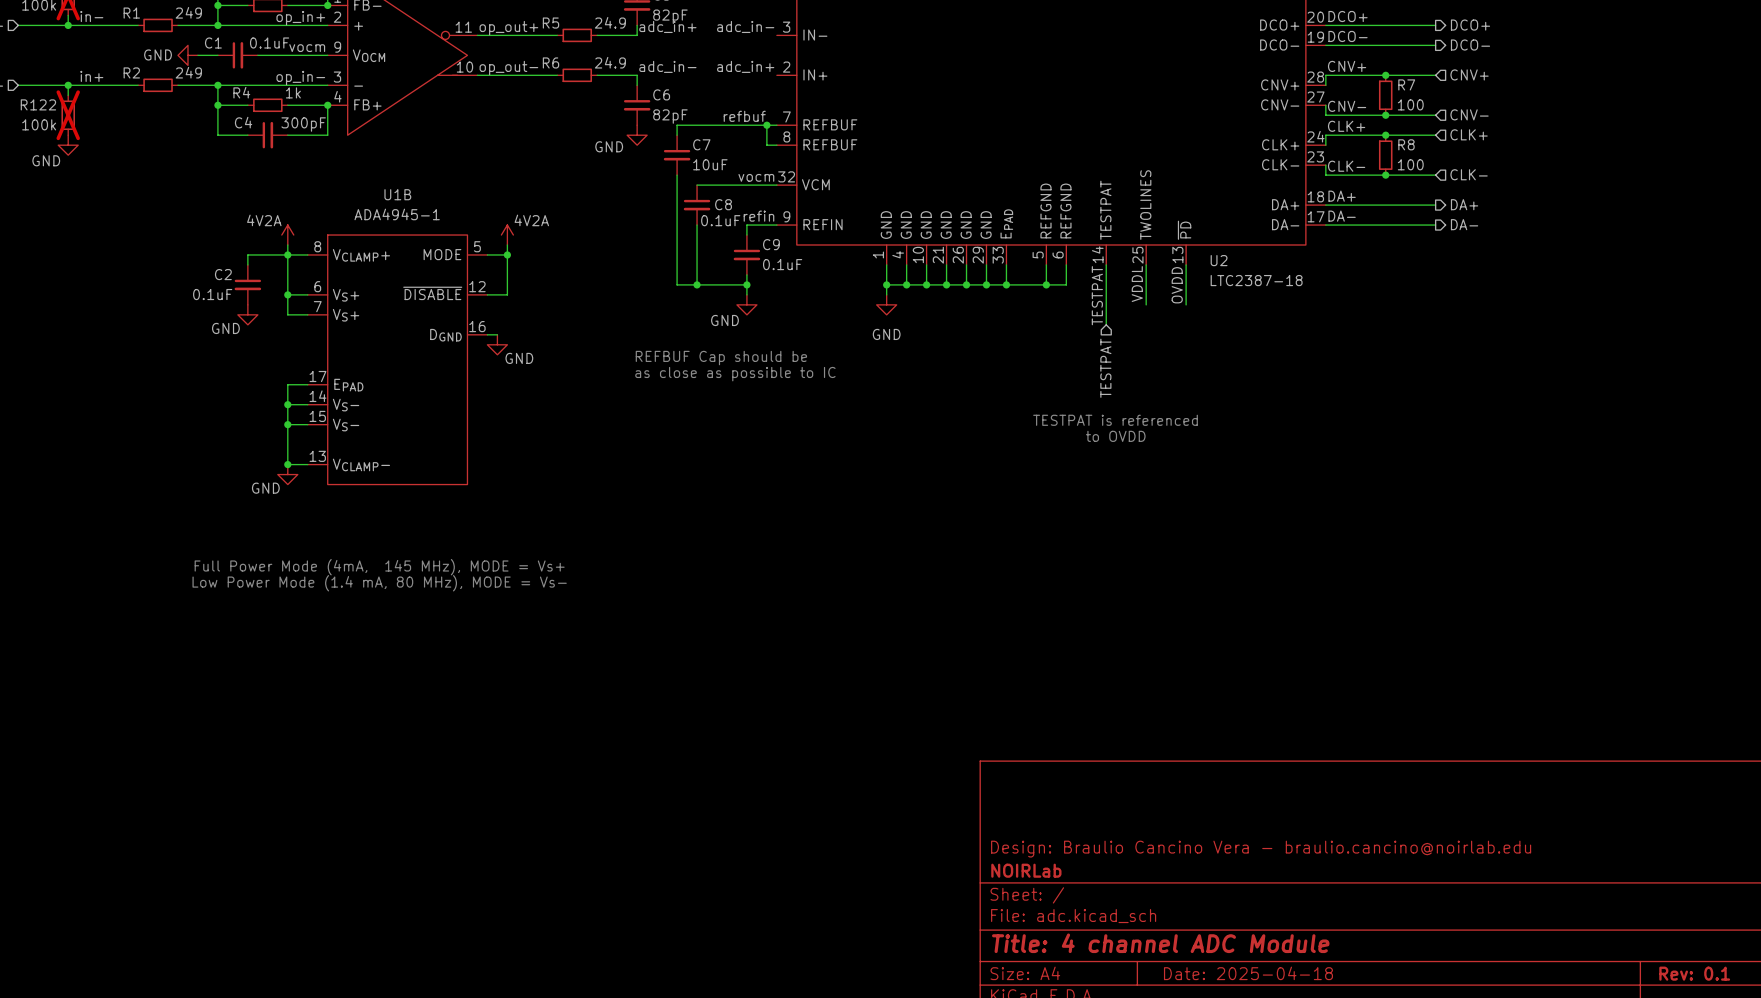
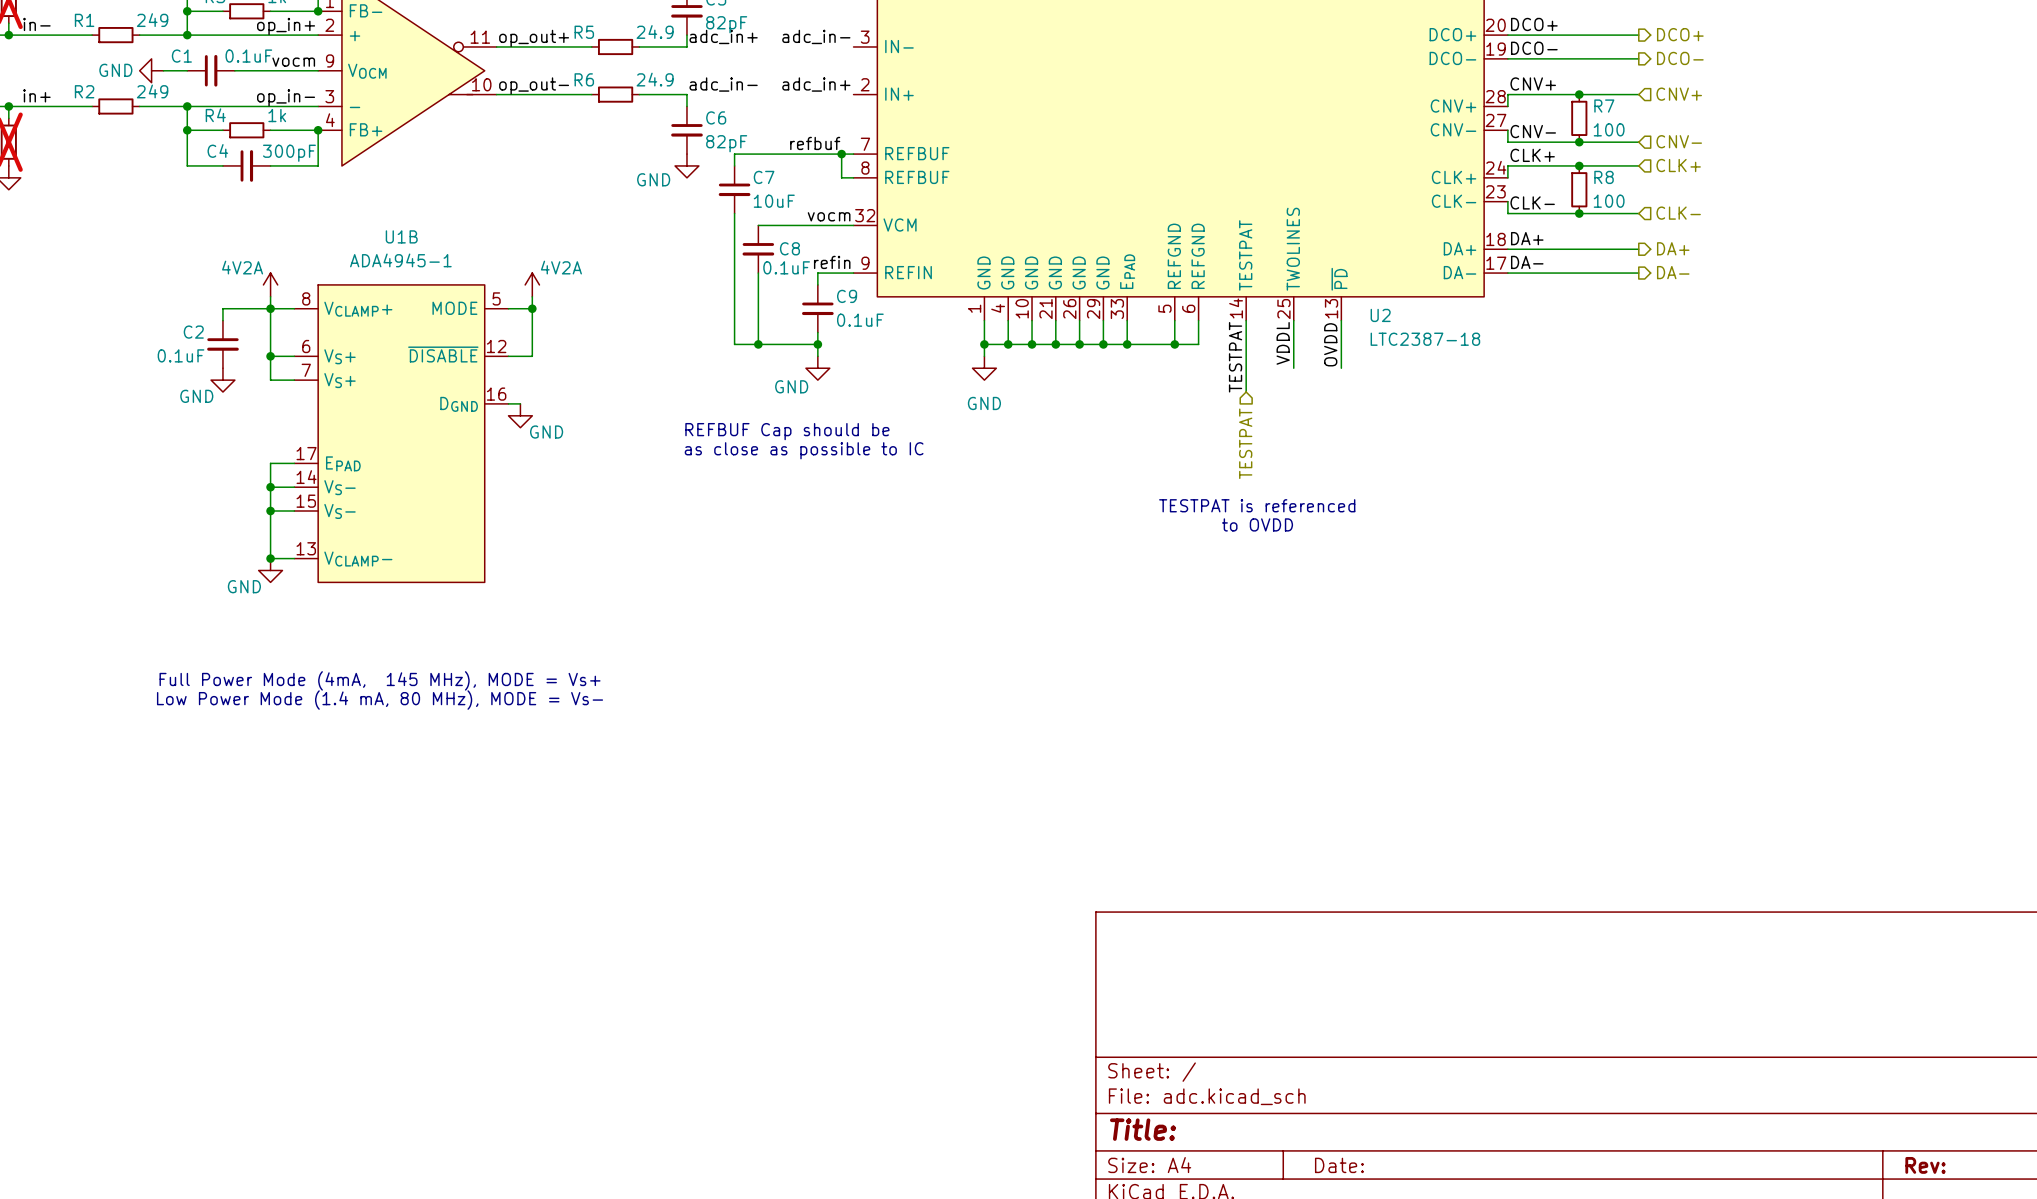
title block: Design: Braulio Cancino Vera - braulio.cancino@noirlab.edu (1261, 849) -> none
title block: NOIRLab (1026, 870) -> none
title block: Title: 4 channel ADC Module (1160, 943) -> Title: (1143, 1129)
title block: Date: 2025-04-18 (1248, 973) -> Date: (1339, 1165)
title block: Rev: 0.1 (1694, 973) -> Rev: (1925, 1165)

